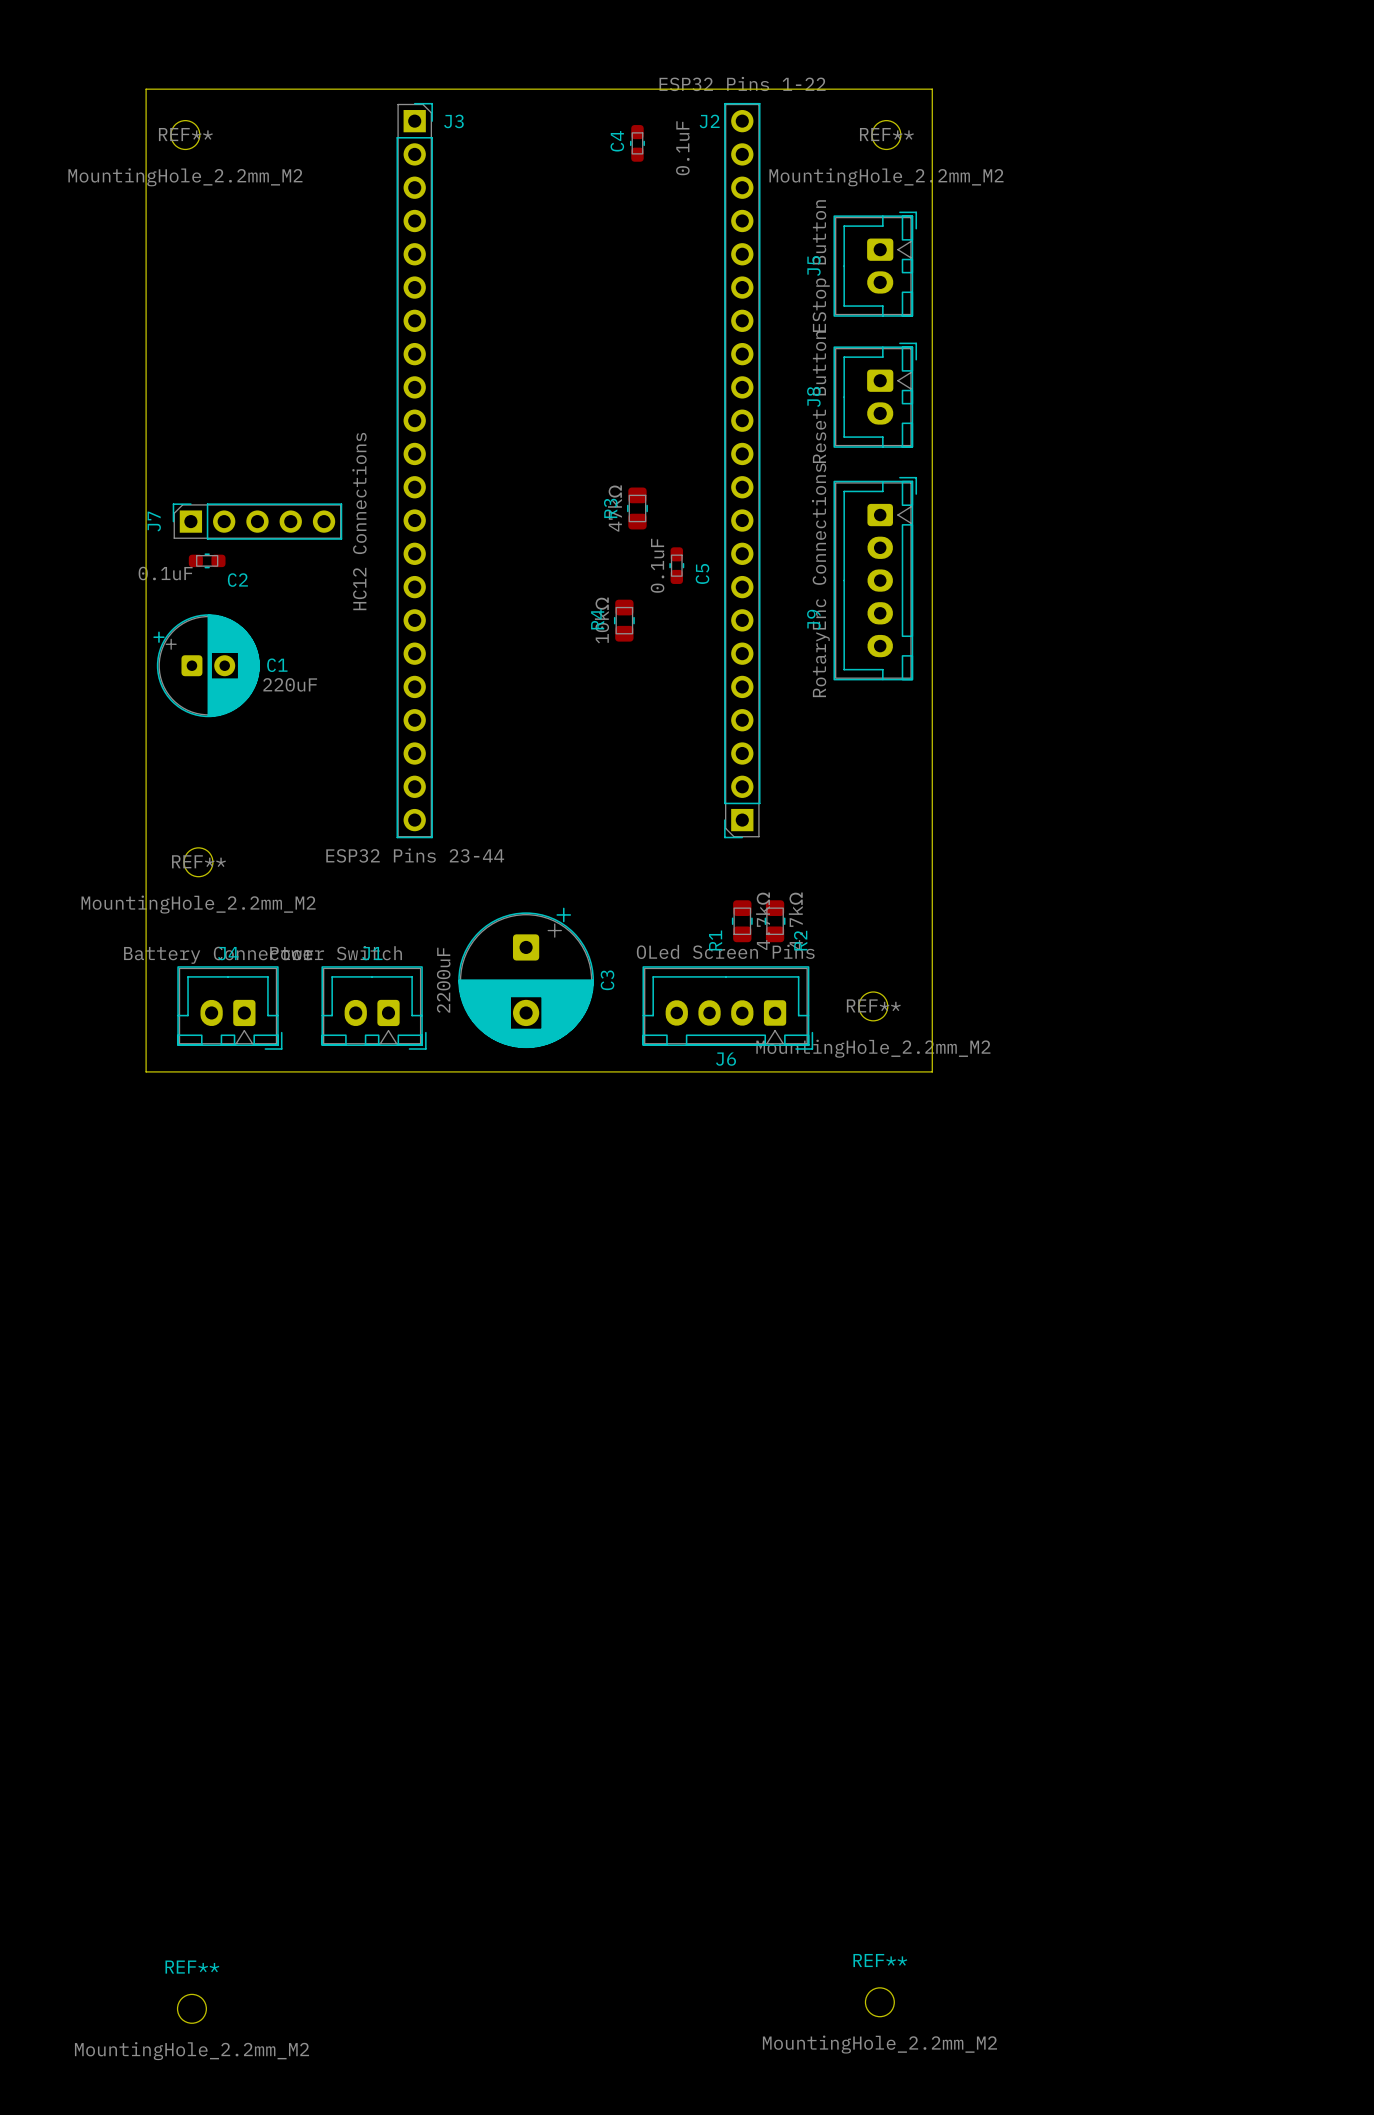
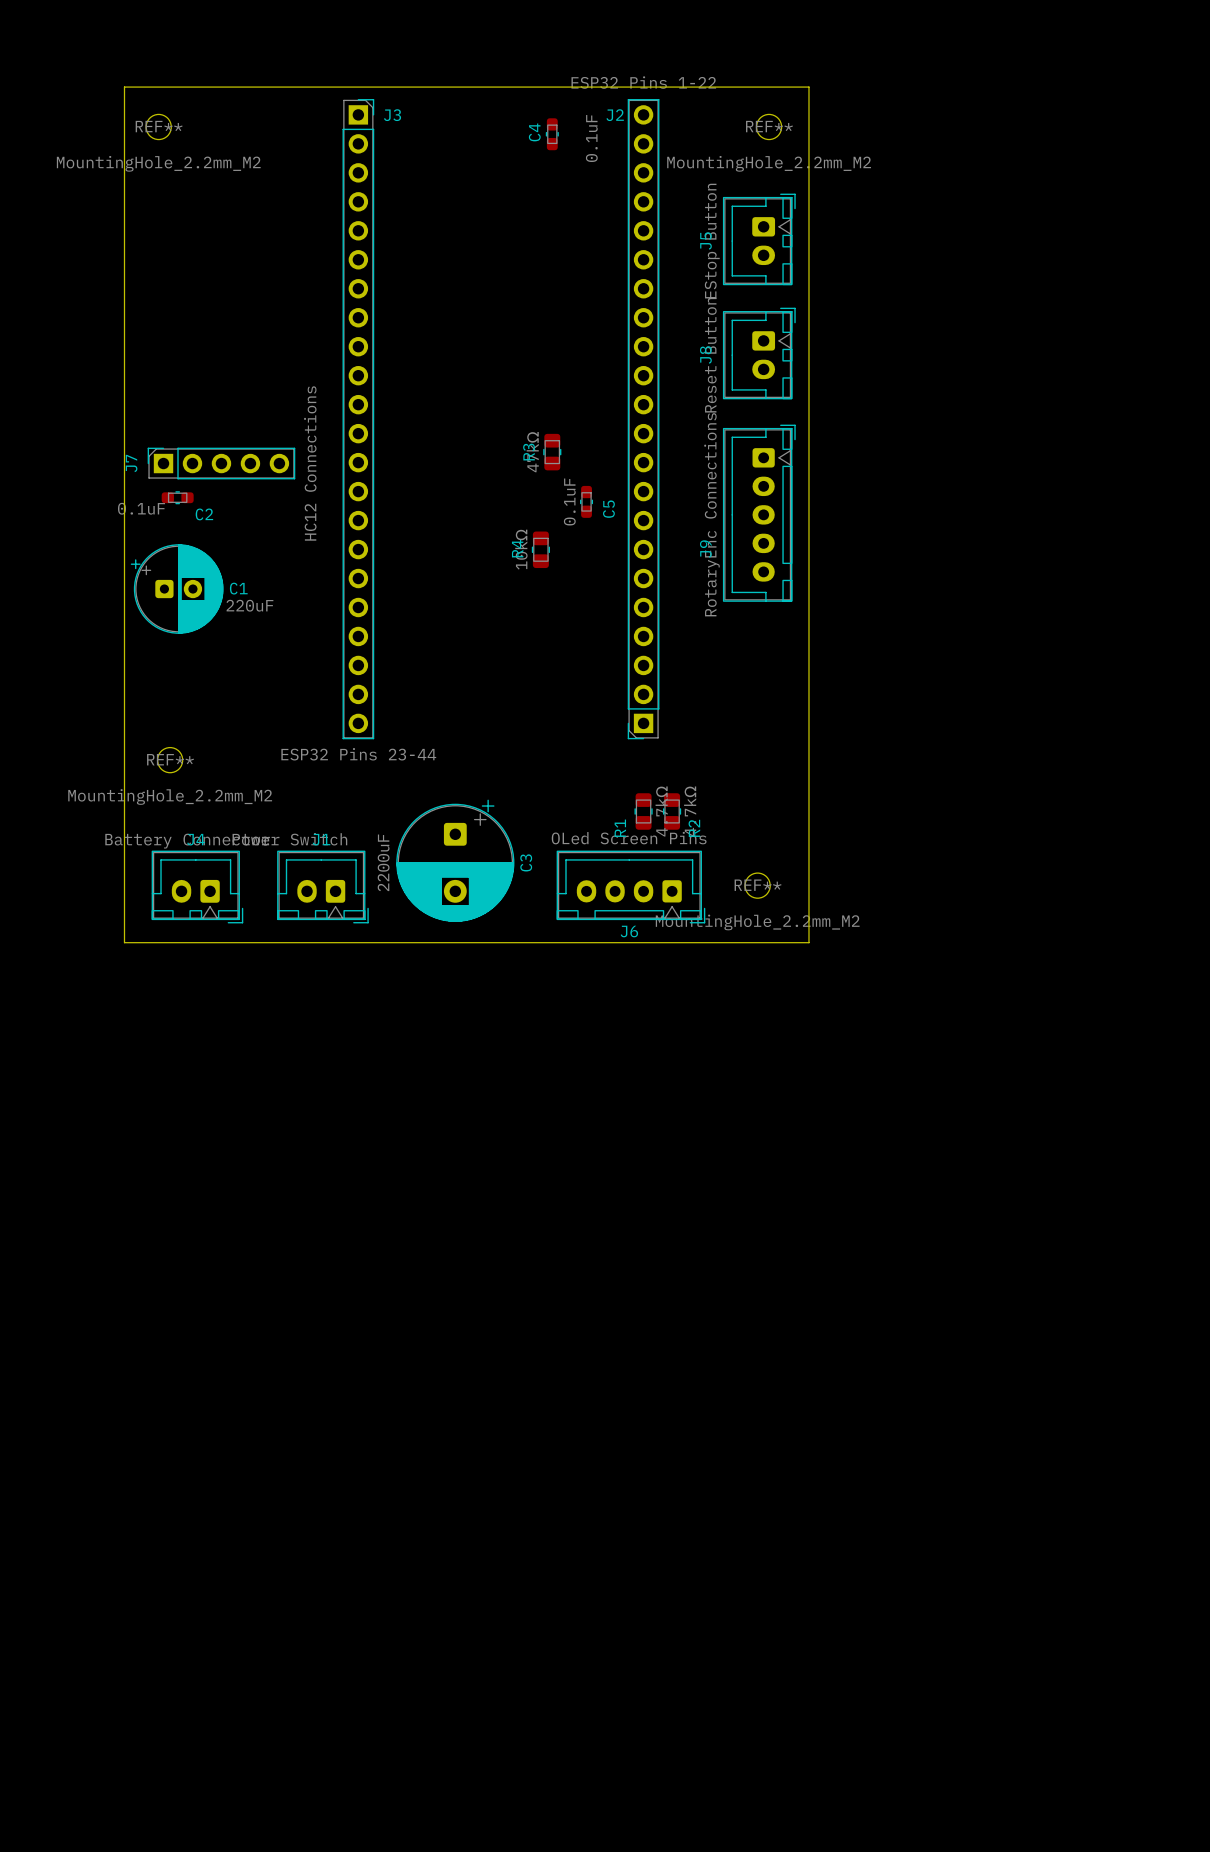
REF**: MountingHole_2.2mm_M2 (879, 2002) -> none
REF**: MountingHole_2.2mm_M2 (191, 2008) -> none

